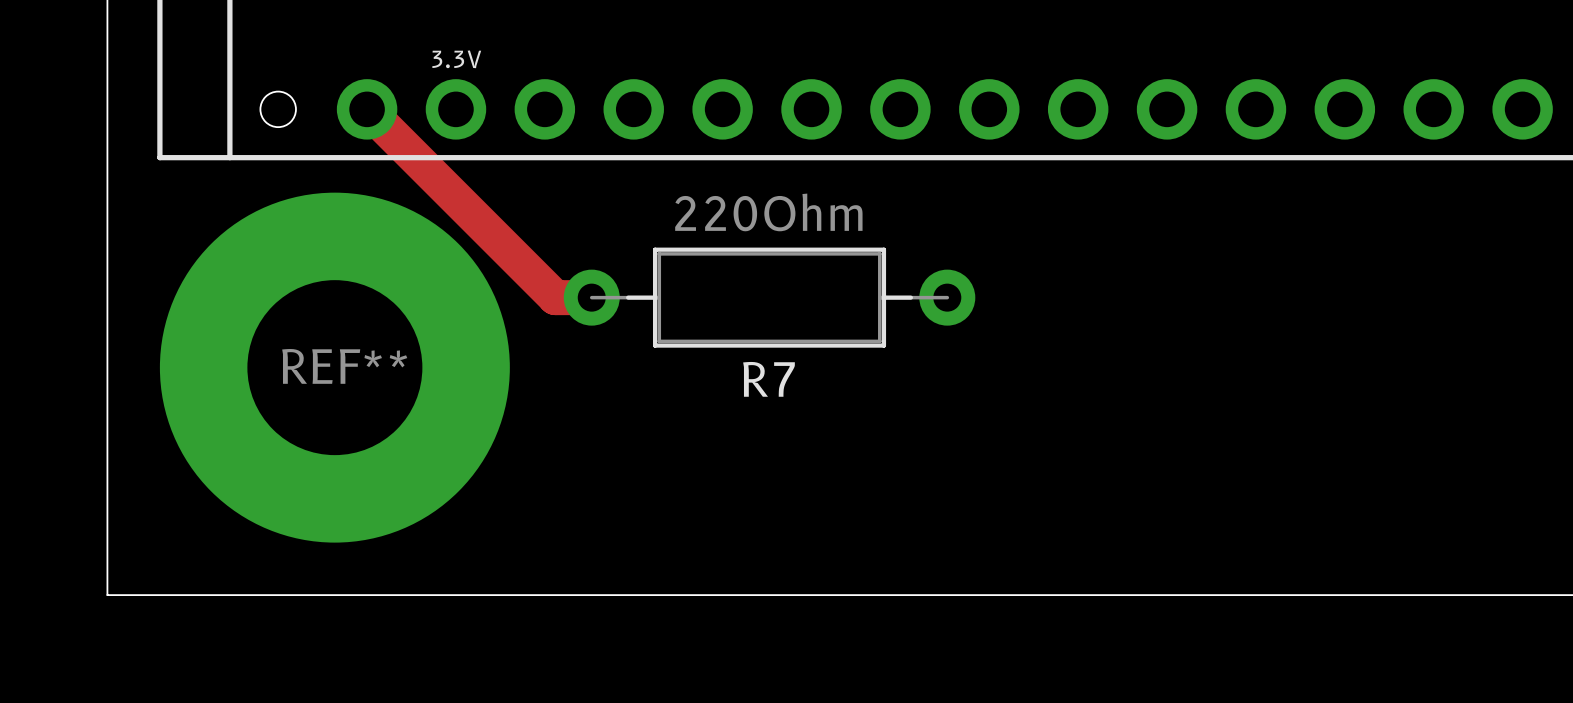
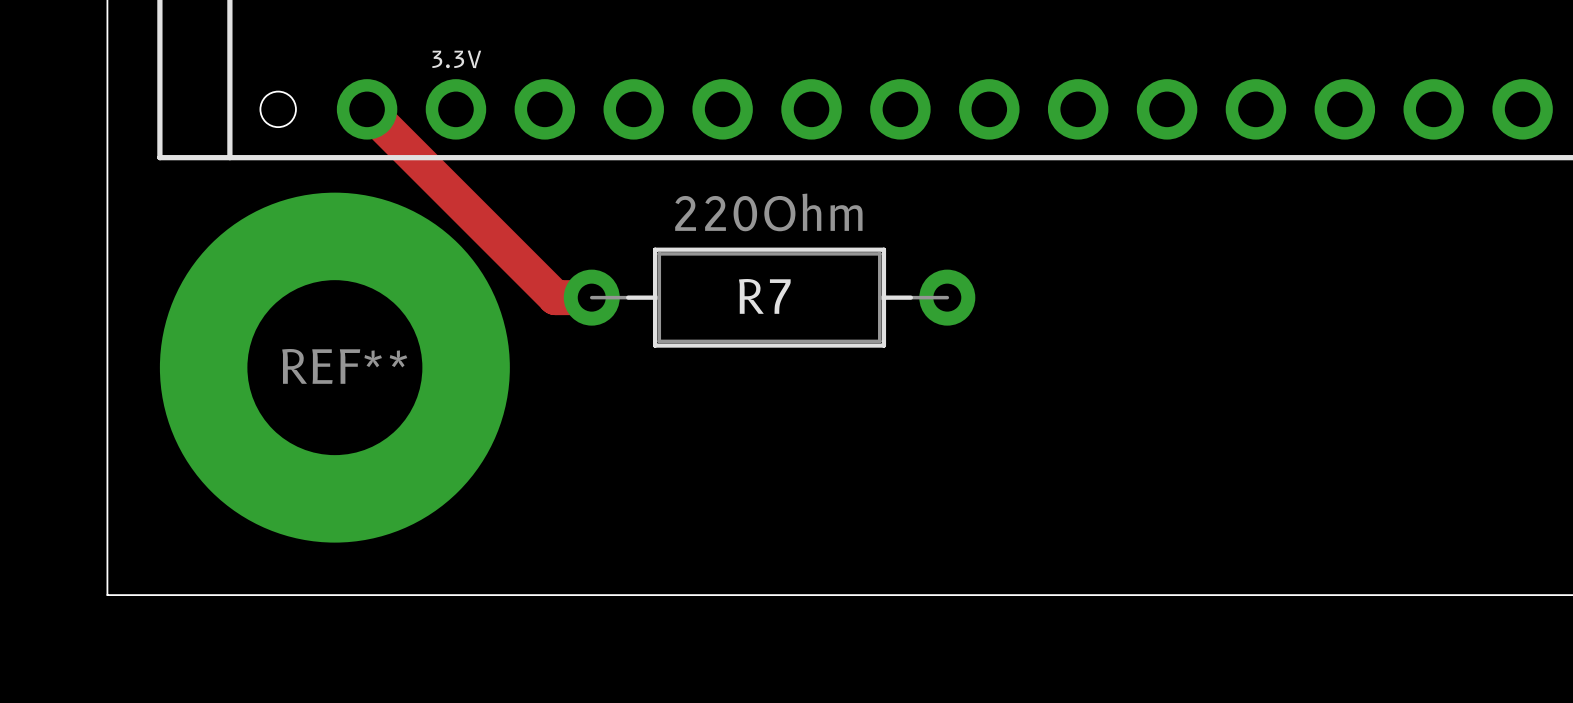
R7 name position: R7 (769, 379) -> R7 (764, 296)

